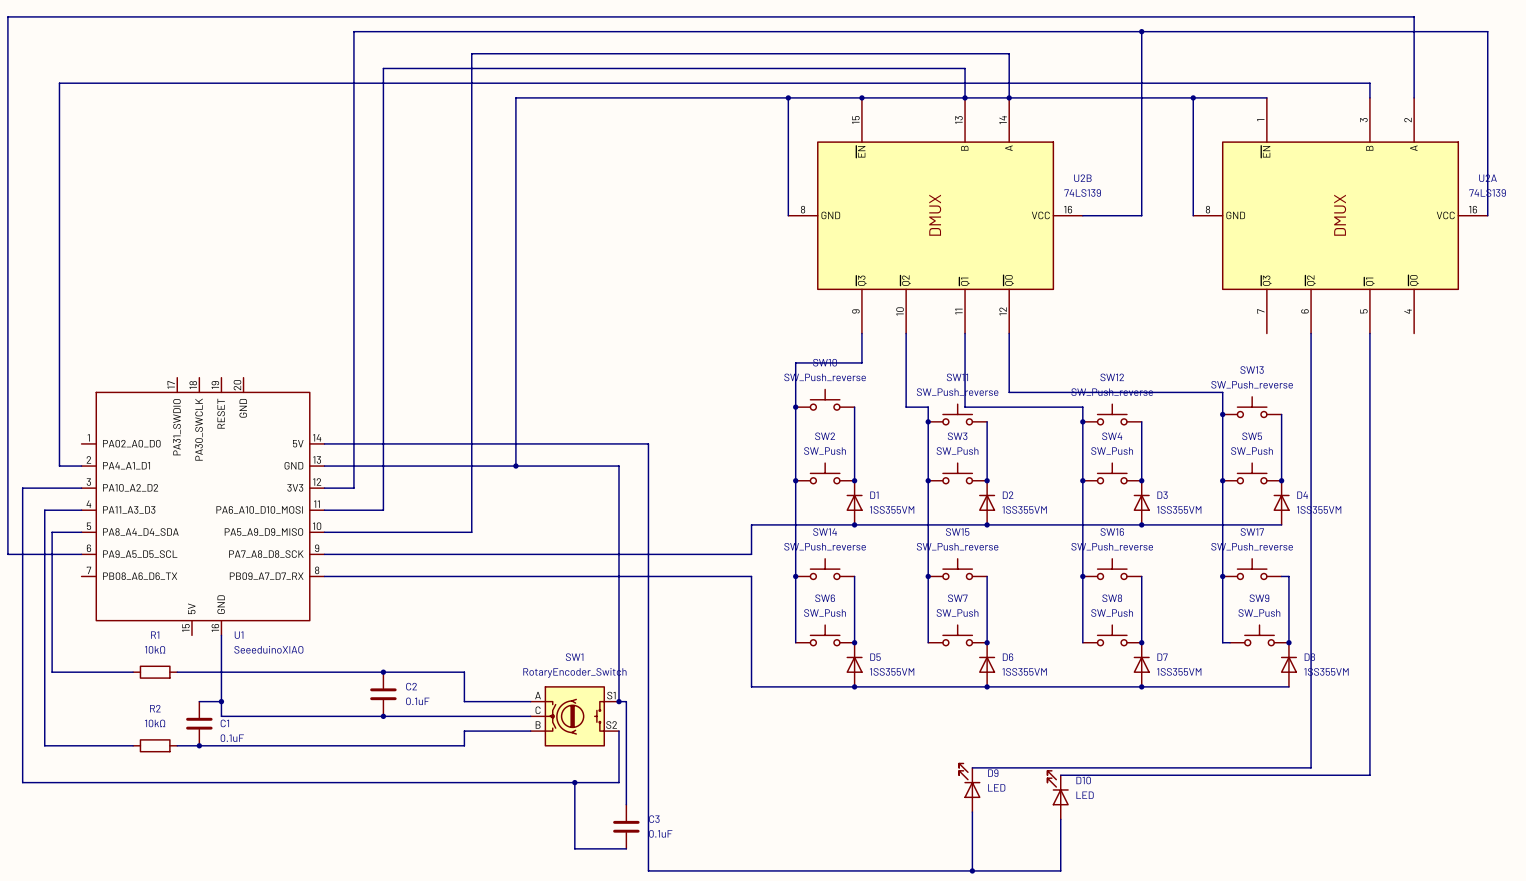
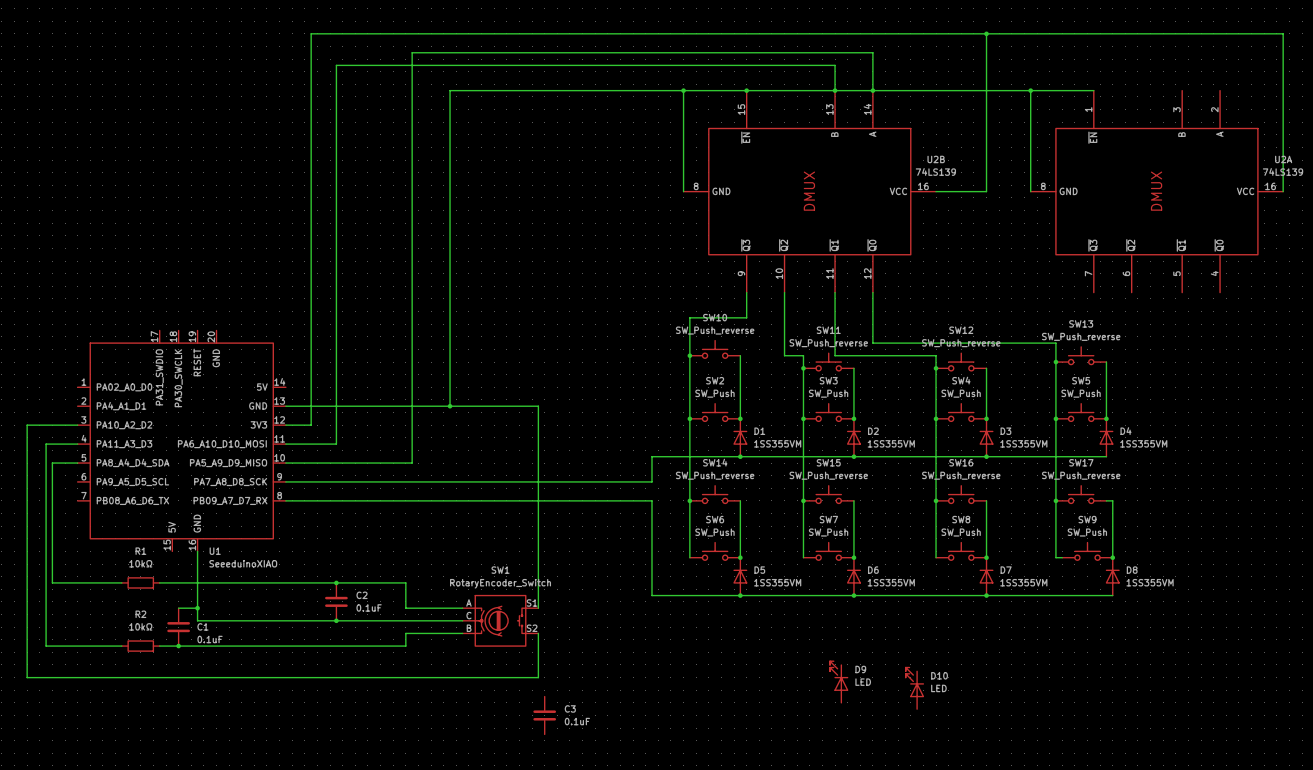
wire: (1369, 97) (1369, 83) (59, 83) (59, 466) (81, 466) -> none
wire: (1414, 97) (1414, 16) (7, 16) (7, 554) (81, 554) -> none
wire: (1311, 333) (1311, 767) (972, 767) -> none
wire: (1369, 333) (1369, 775) (1060, 775) -> none
wire: (324, 443) (648, 443) (648, 870) (1060, 870) (1060, 819) -> none
wire: (619, 701) (626, 701) (626, 804) -> none
junction: (619, 701) -> none
wire: (574, 782) (574, 848) (626, 848) -> none
junction: (574, 782) -> none
wire: (972, 812) (972, 870) -> none
junction: (972, 870) -> none

